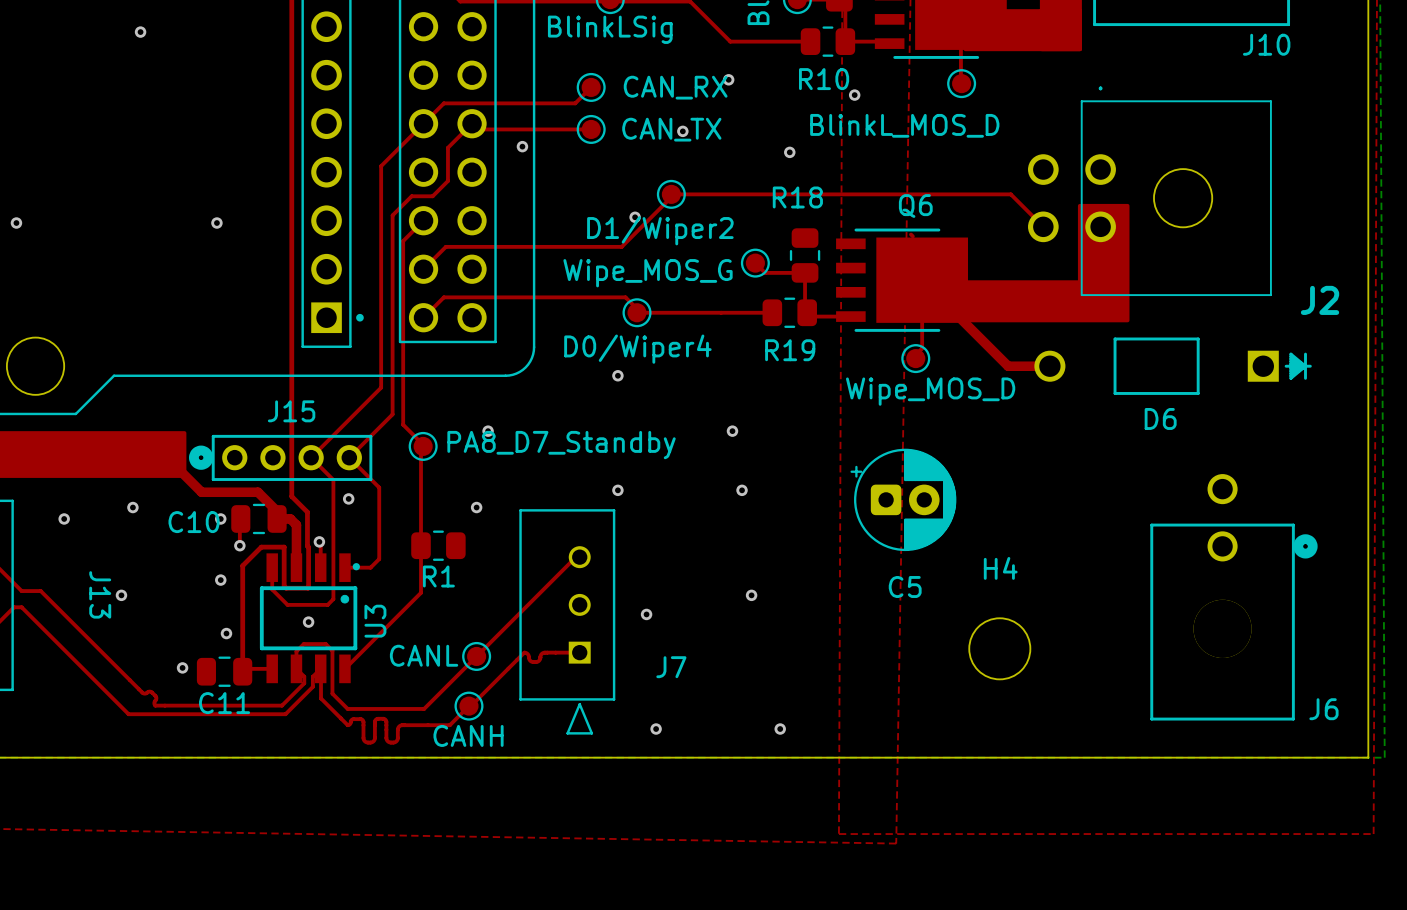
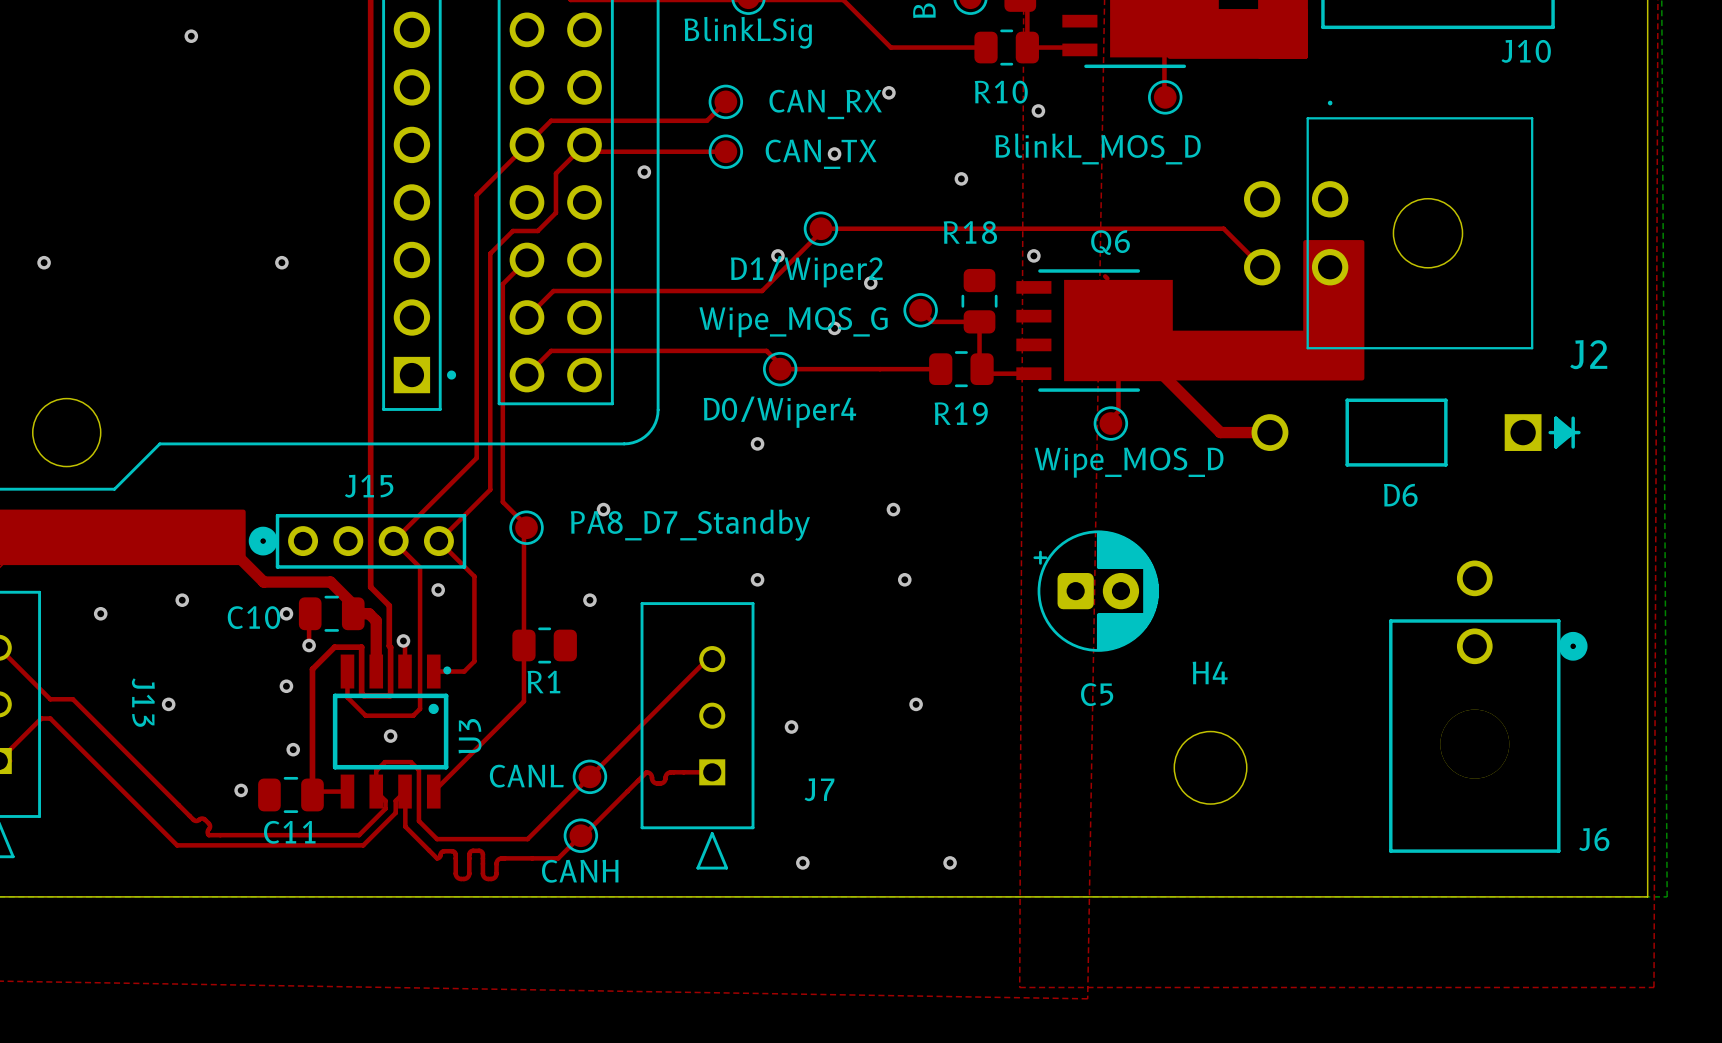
via: none -> (1033, 255)
via: none -> (870, 283)
via: none -> (834, 328)

